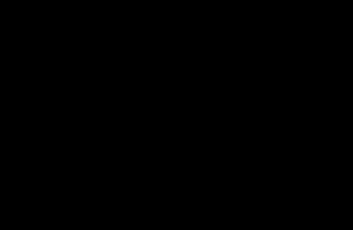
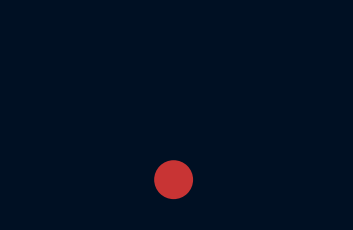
part: none -> (173, 179)

